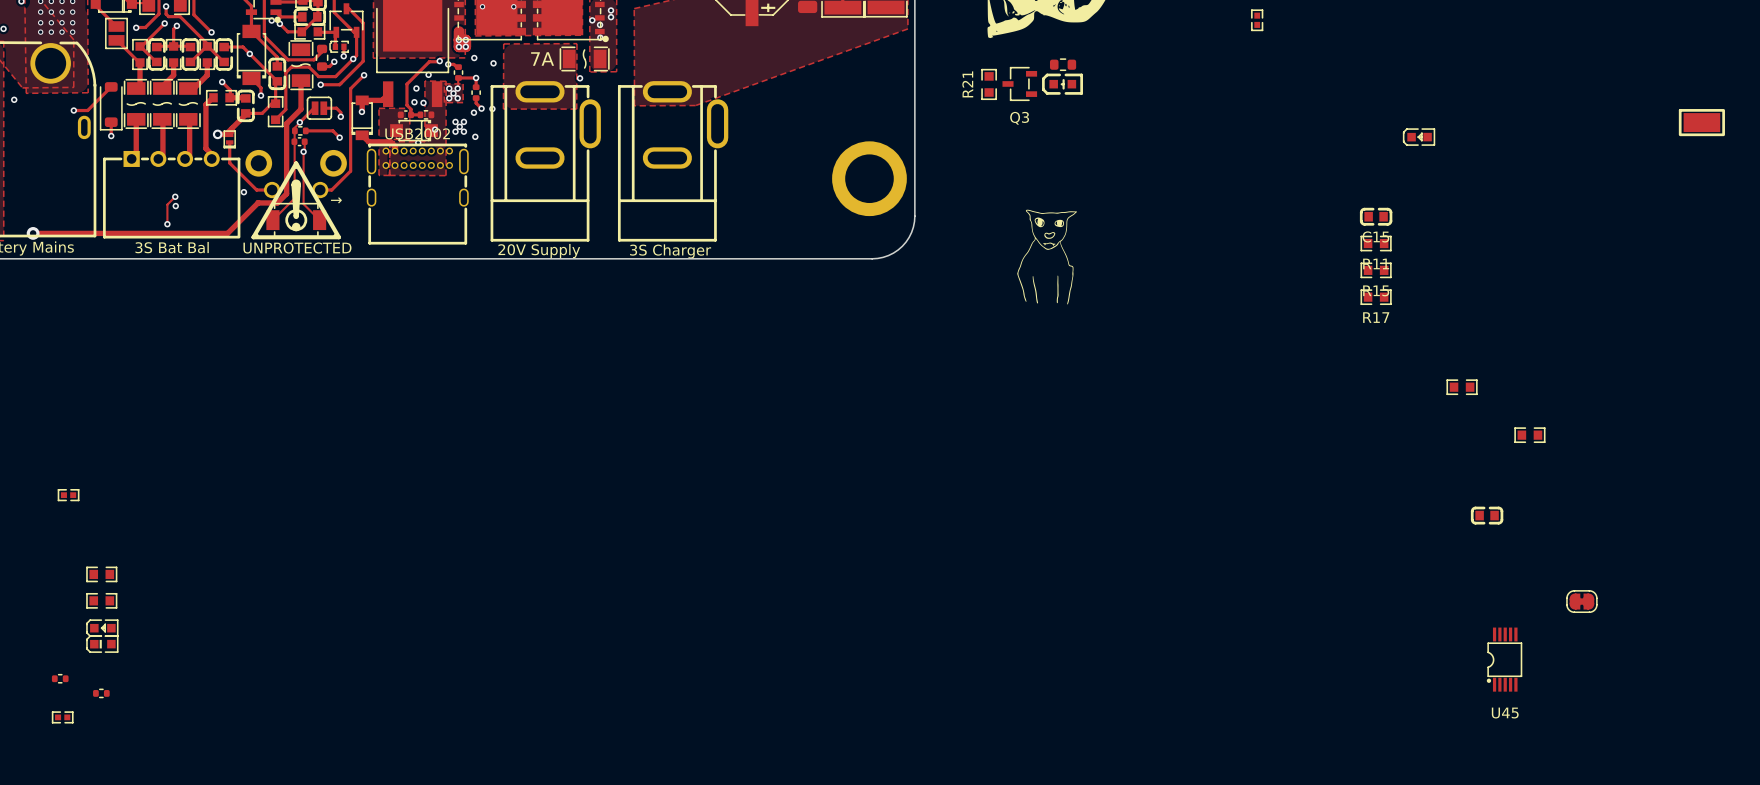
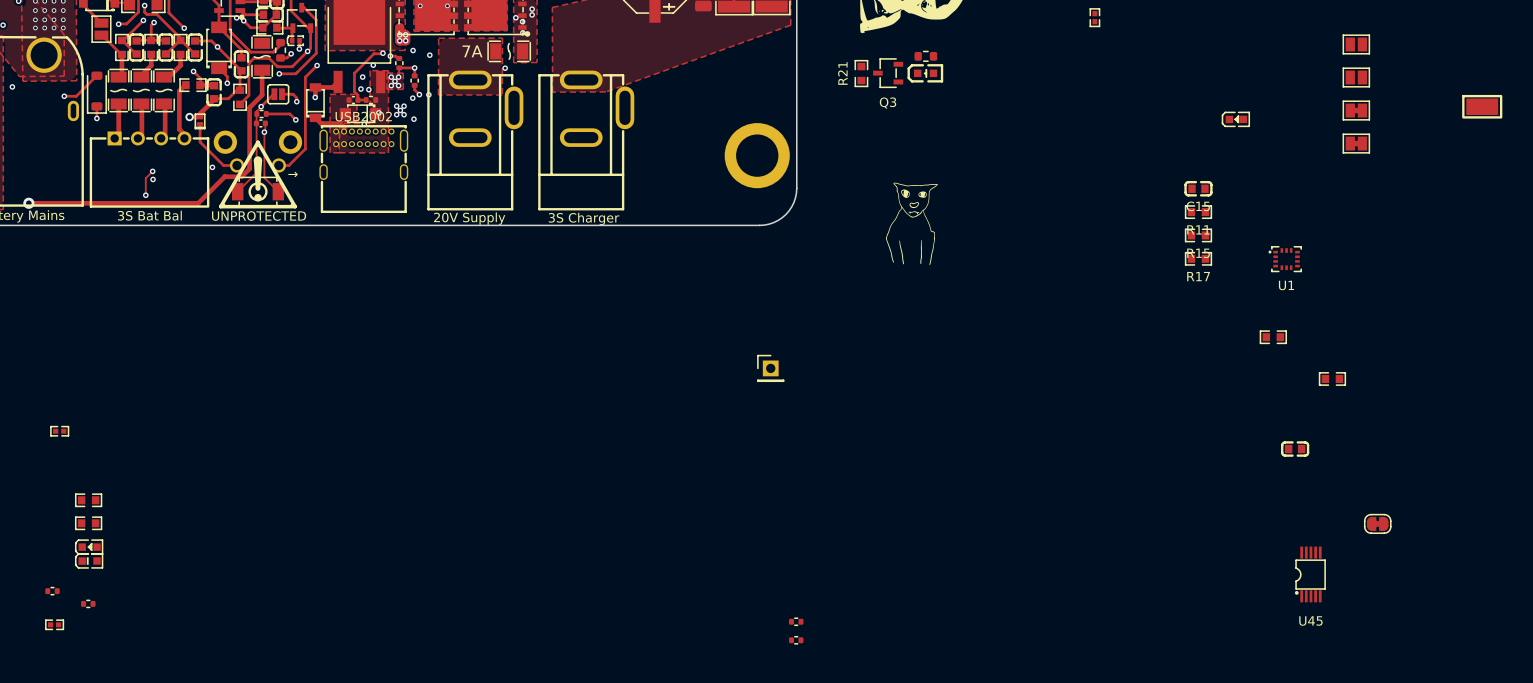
part: none -> (1356, 44)
part: none -> (1356, 77)
part: none -> (1356, 110)
part: none -> (1356, 143)
U1: none -> (1285, 259)
part: none -> (770, 368)
part: none -> (796, 621)
part: none -> (796, 640)

